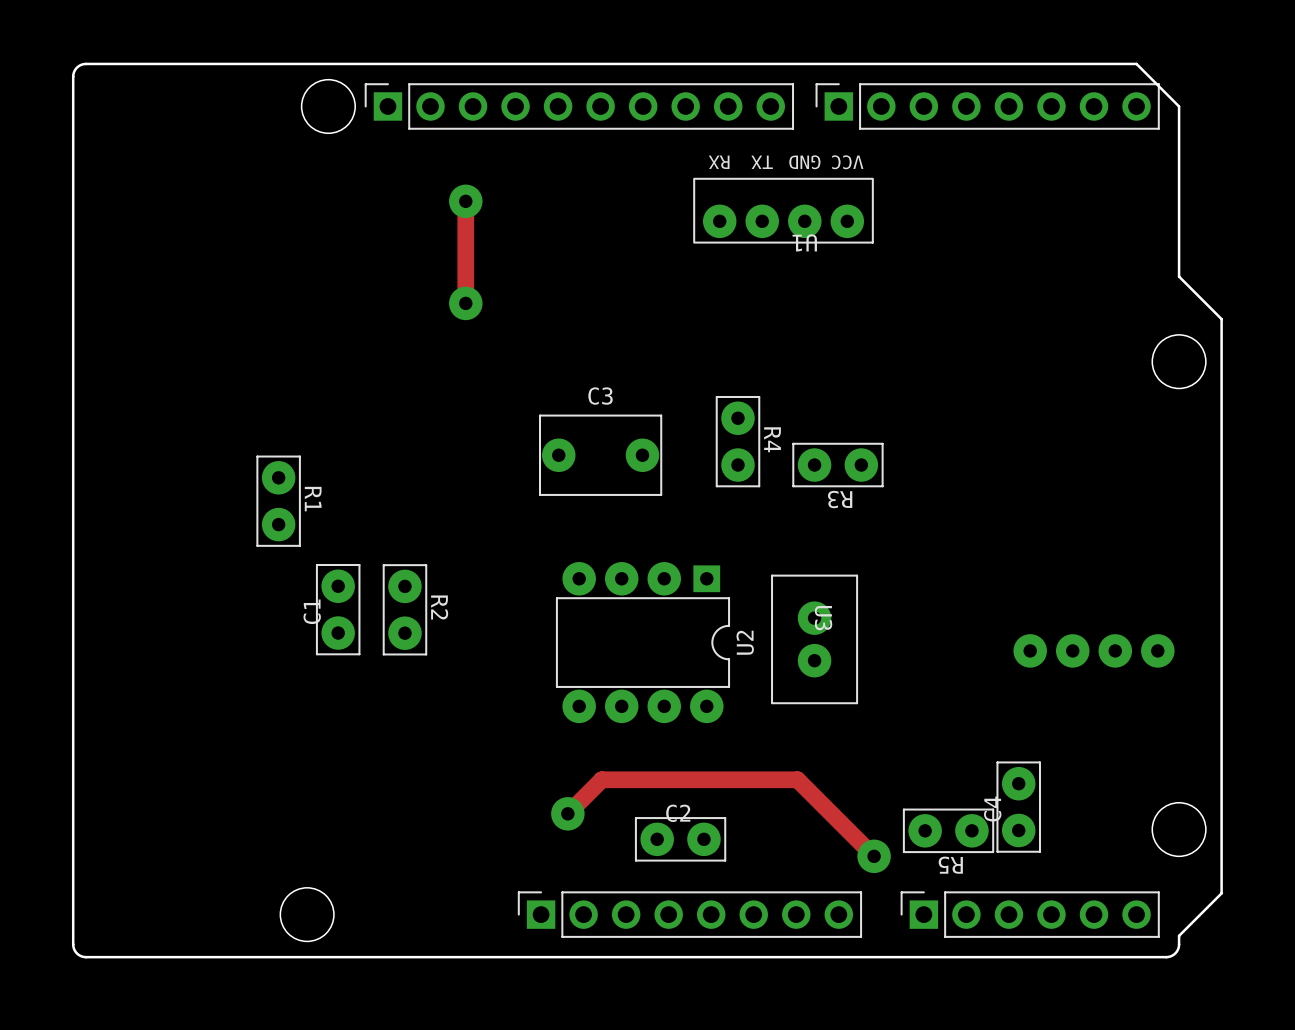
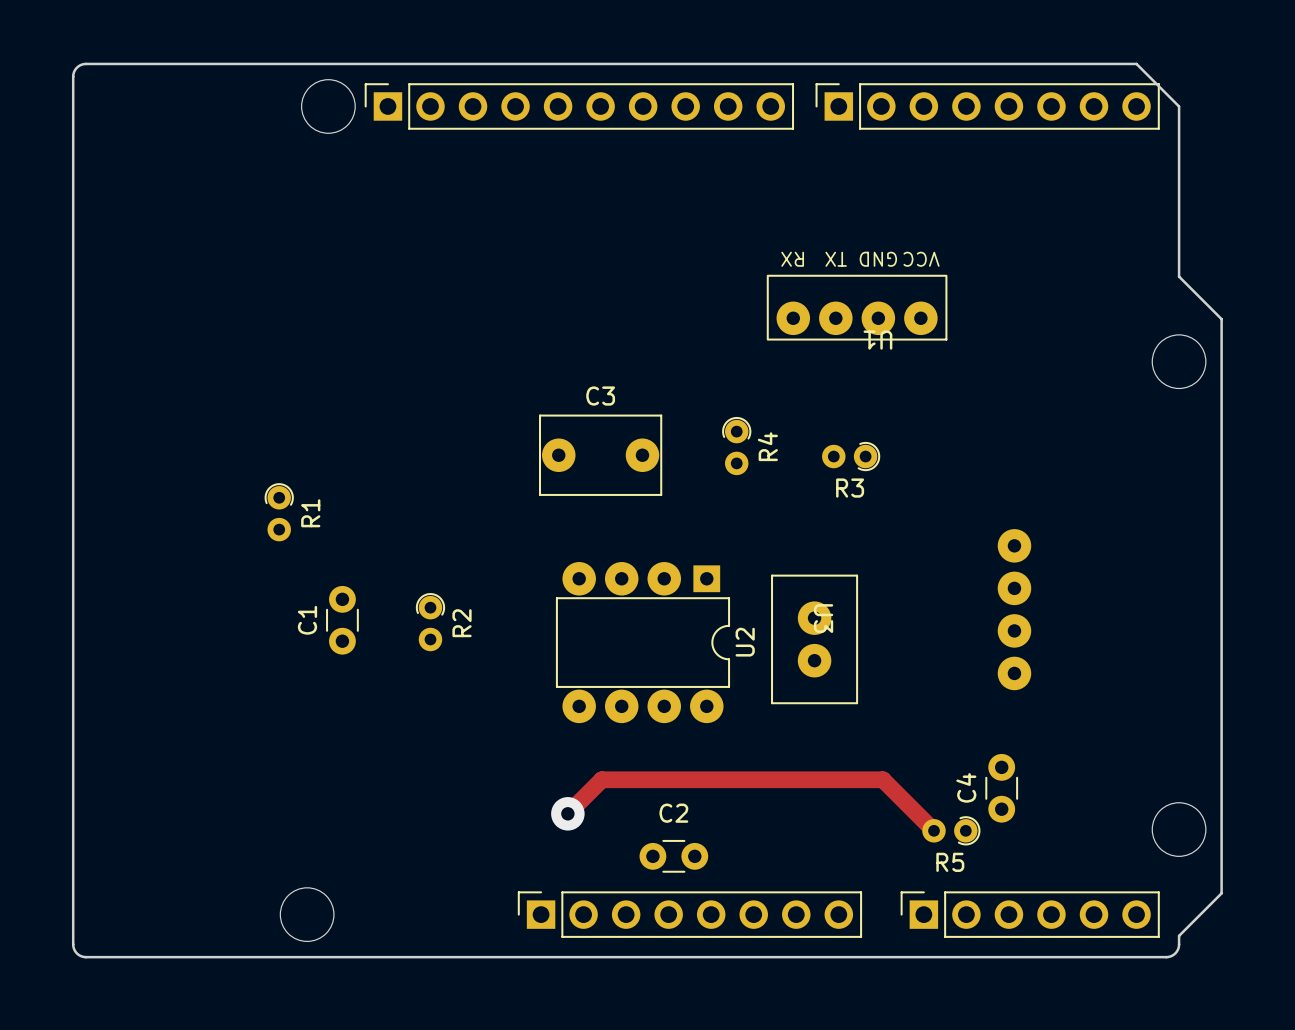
track: (465, 201) (465, 303) -> none
via: (465, 201) -> none
U1 position: (783, 210) -> (857, 307)
via: (465, 303) -> none
R4 footprint: [715, 395, 761, 488] -> [722, 416, 752, 476]
R3 footprint: [792, 442, 884, 488] -> [822, 441, 881, 472]
R1 footprint: [256, 455, 301, 547] -> [264, 483, 294, 542]
C1 footprint: [315, 563, 361, 656] -> [326, 585, 359, 655]
R2 footprint: [382, 564, 428, 656] -> [415, 593, 446, 652]
part rotation: 0° (1094, 650) -> 90° clockwise (1014, 609)
C4 footprint: [996, 761, 1041, 853] -> [985, 753, 1019, 823]
track: (797, 779) (874, 856) -> (797, 779) (882, 779) (934, 830)
R5 footprint: [902, 808, 995, 854] -> [922, 816, 981, 846]
C2 footprint: [634, 817, 727, 862] -> [639, 839, 709, 873]
via: (874, 856) -> none

